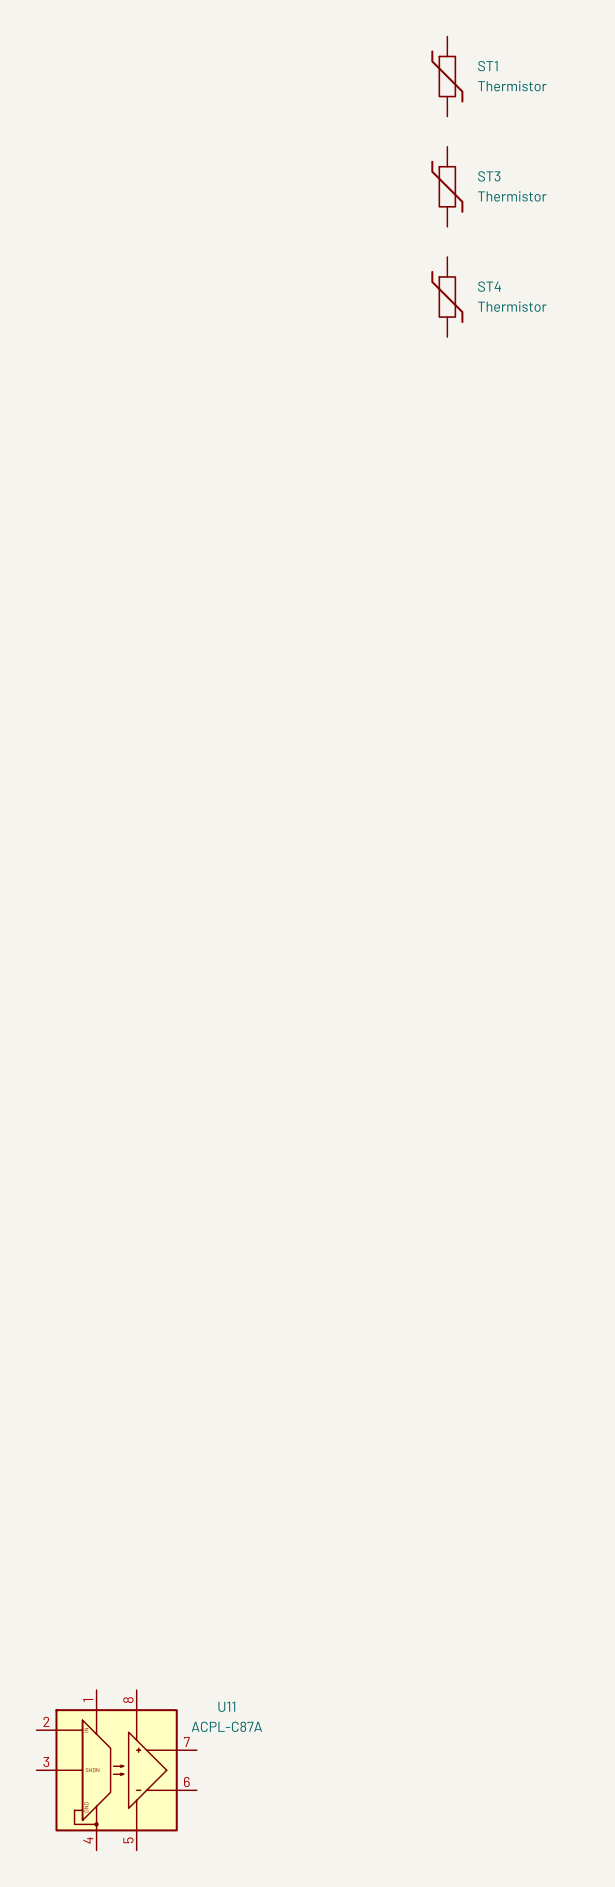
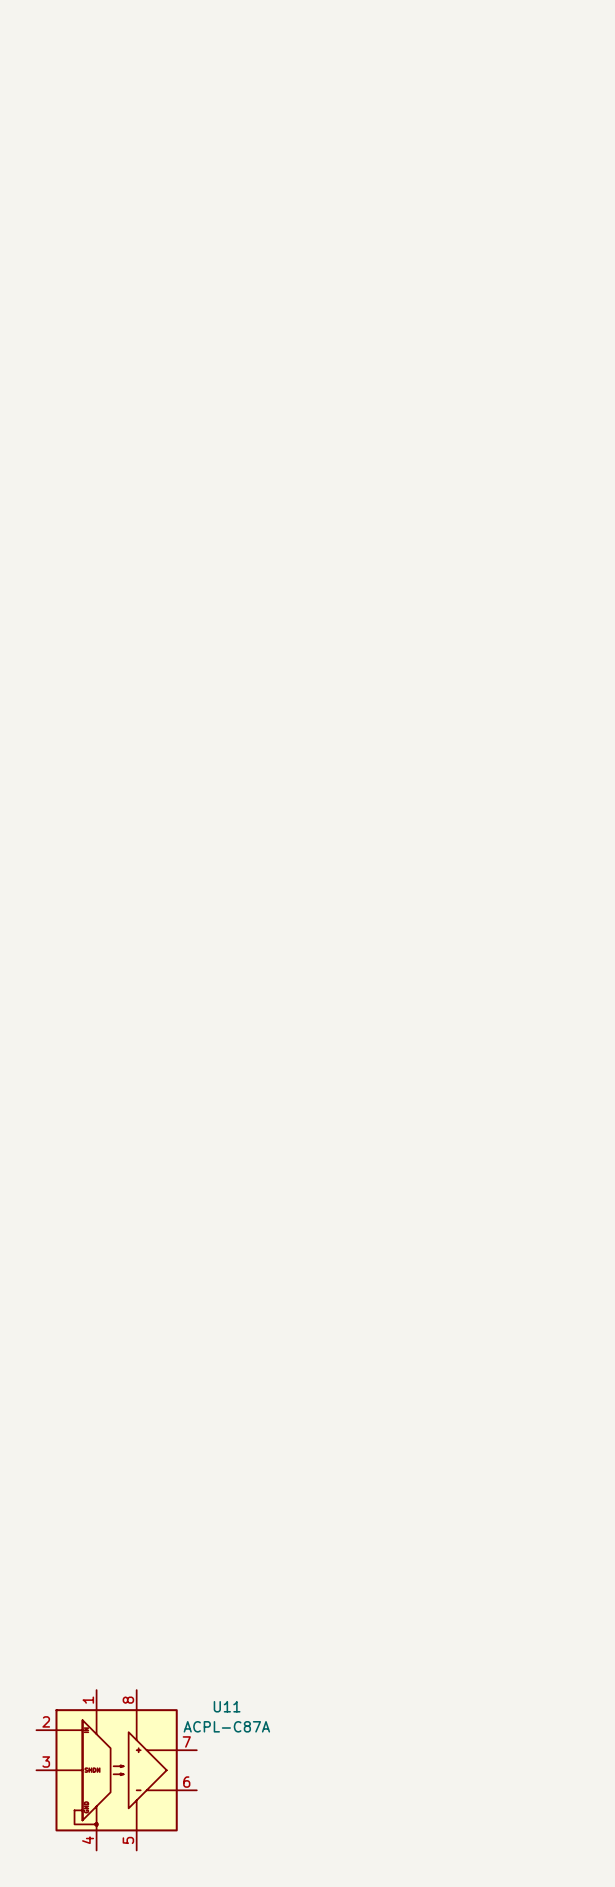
ST1: Thermistor (447, 76) -> none
ST3: Thermistor (447, 186) -> none
ST4: Thermistor (447, 297) -> none

